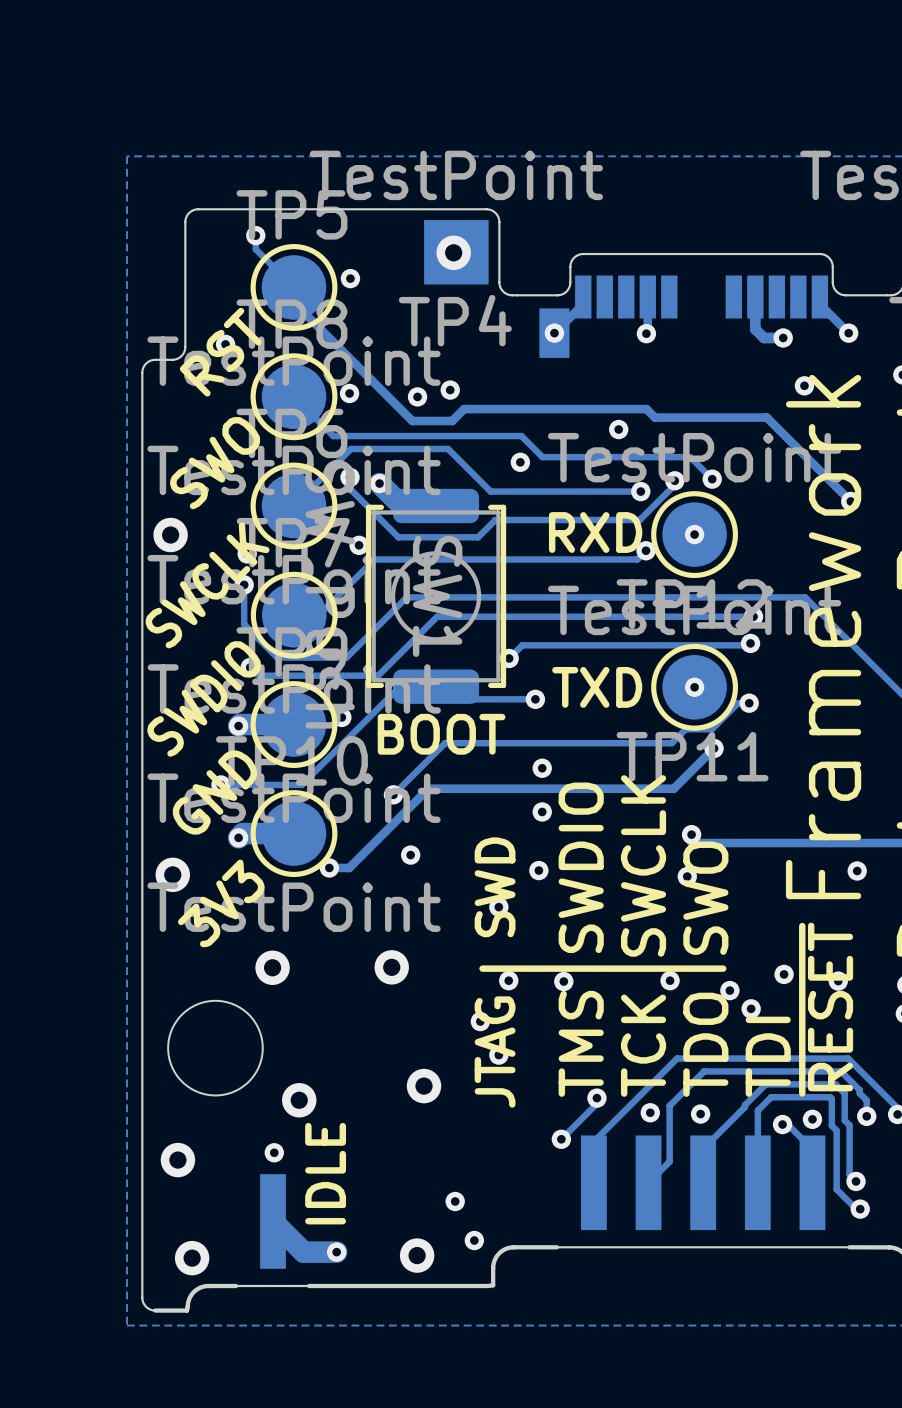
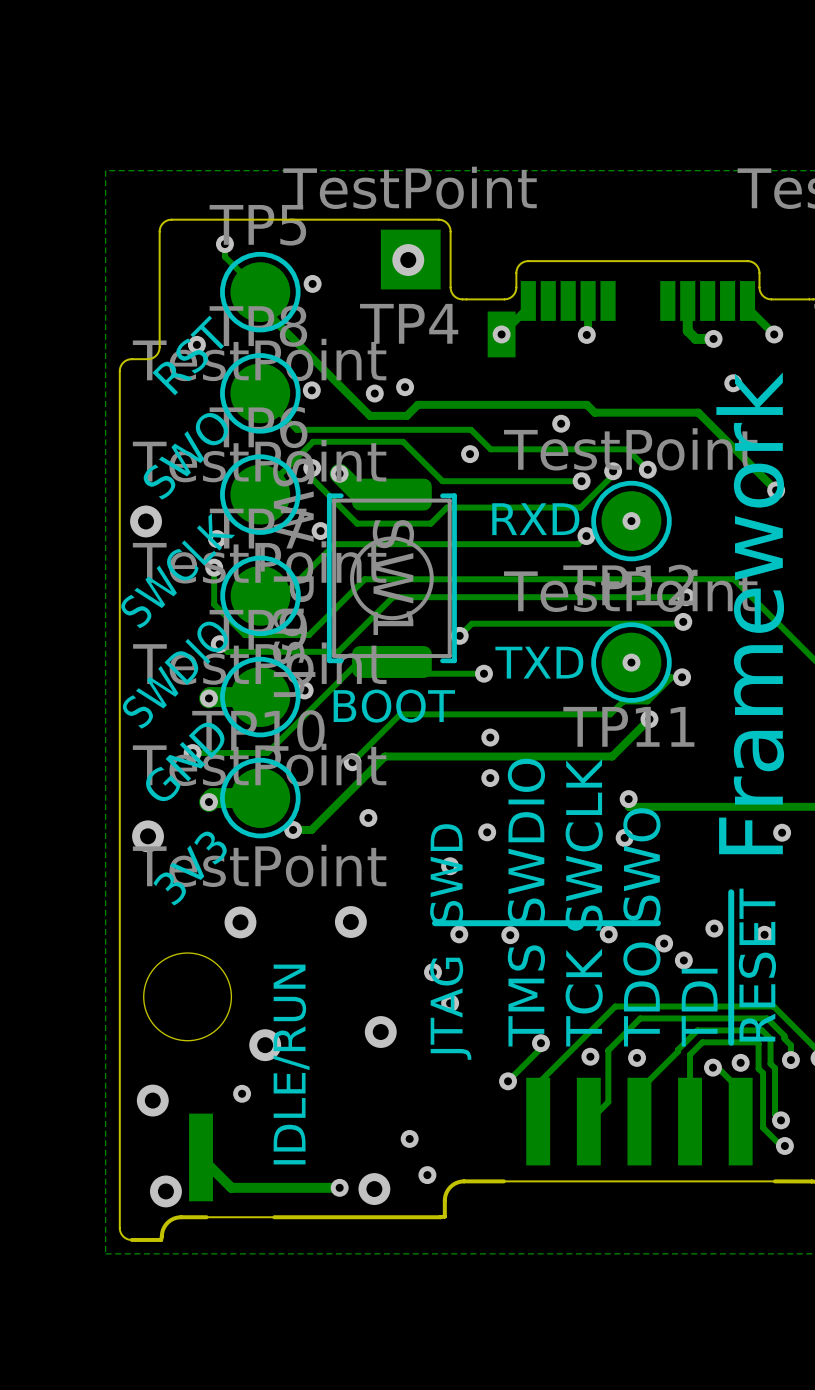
text: IDLE (325, 1173) -> IDLE/RUN (291, 1064)
part footprint: [234, 1174, 311, 1288] -> [189, 1113, 276, 1219]
track: none -> (201, 1157) (231, 1187) (339, 1187)
track: (273, 1221) (303, 1252) (336, 1252) -> none
via position: (336, 1252) -> (339, 1187)

